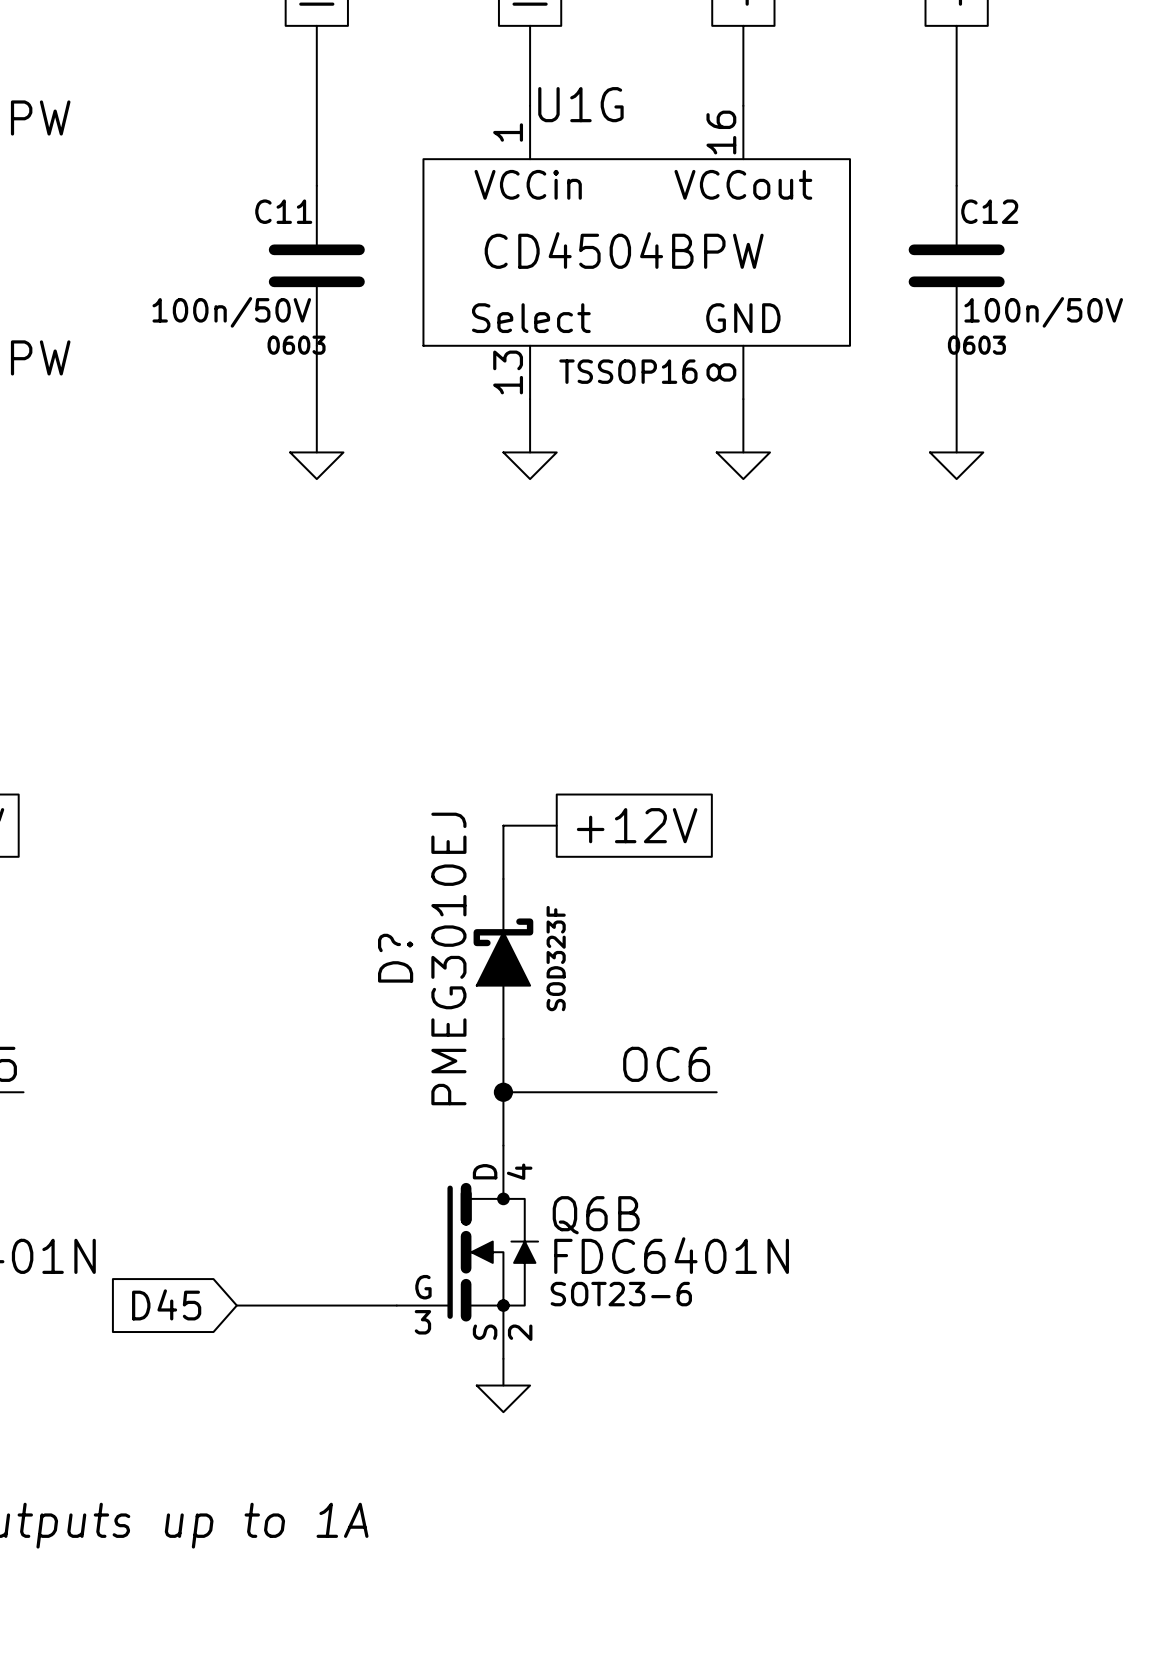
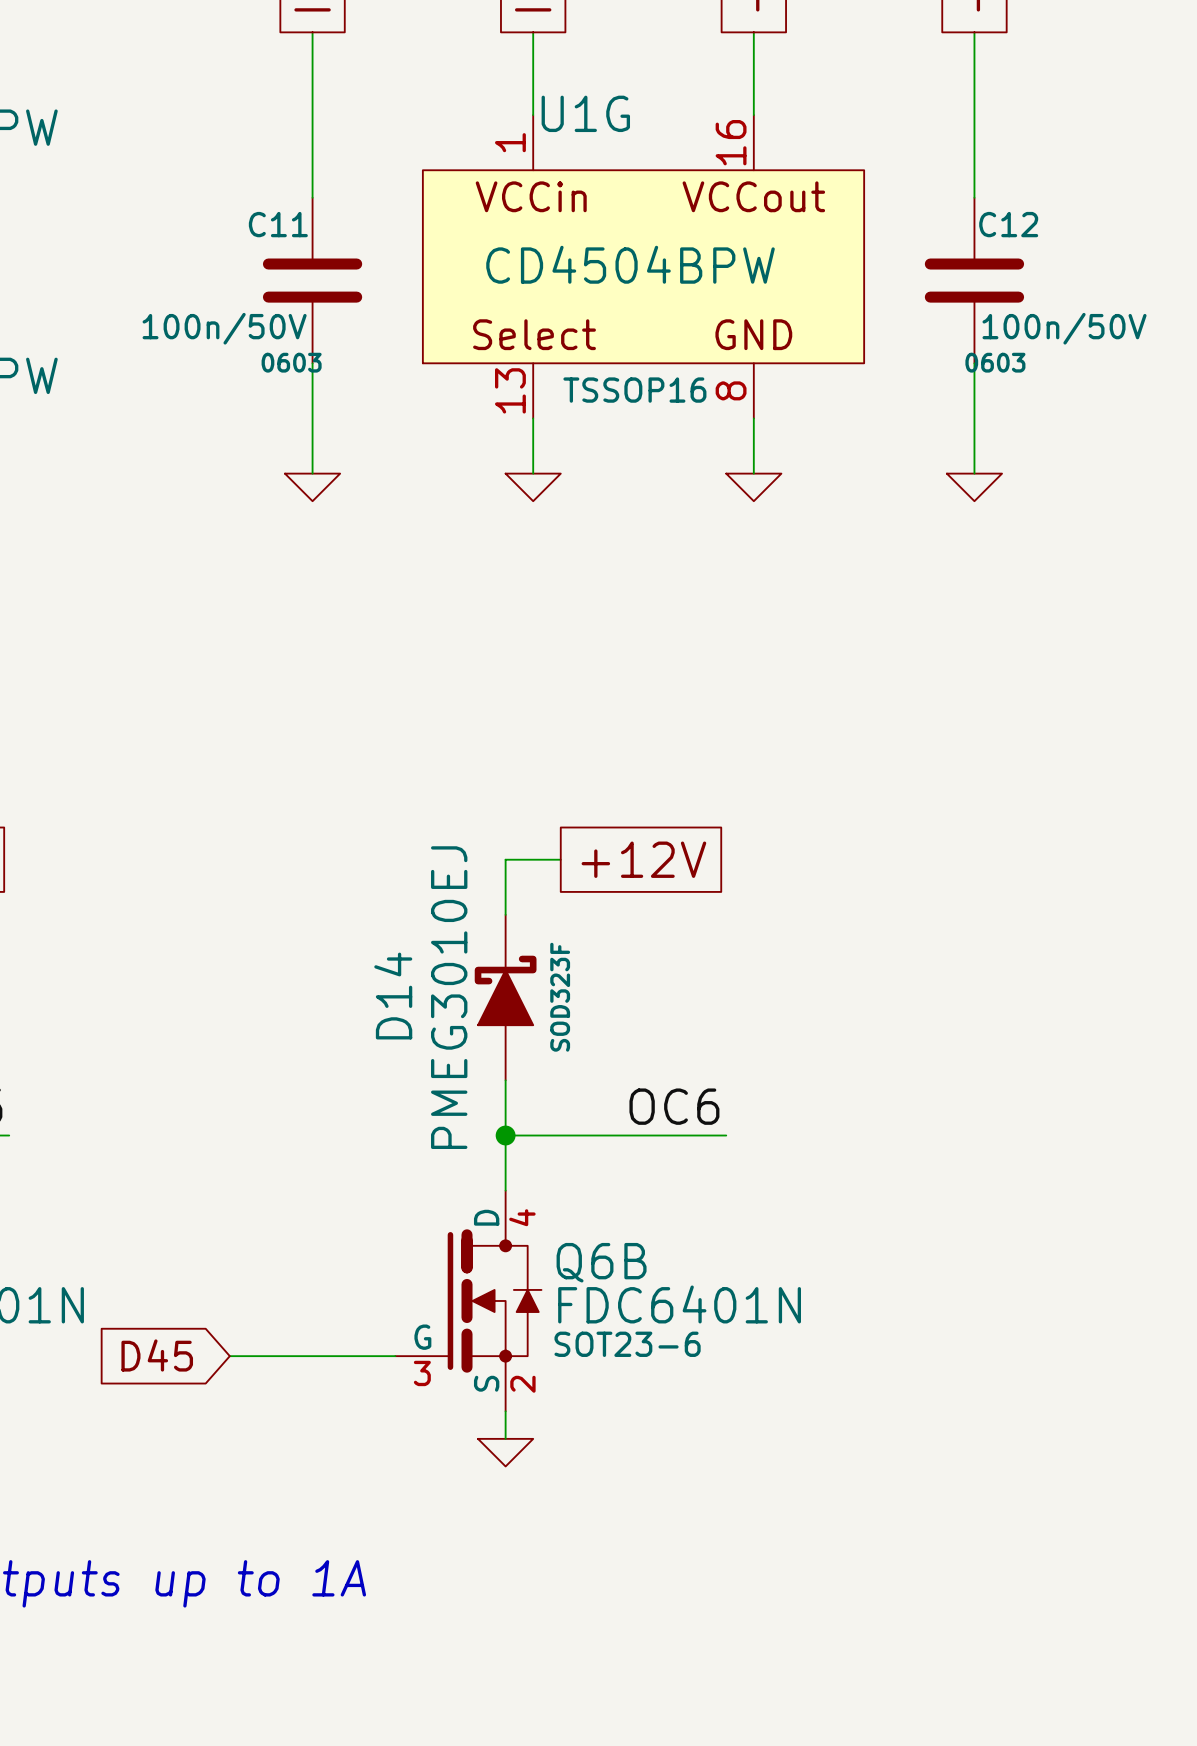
D? name: D? (395, 958) -> D14 (393, 996)

